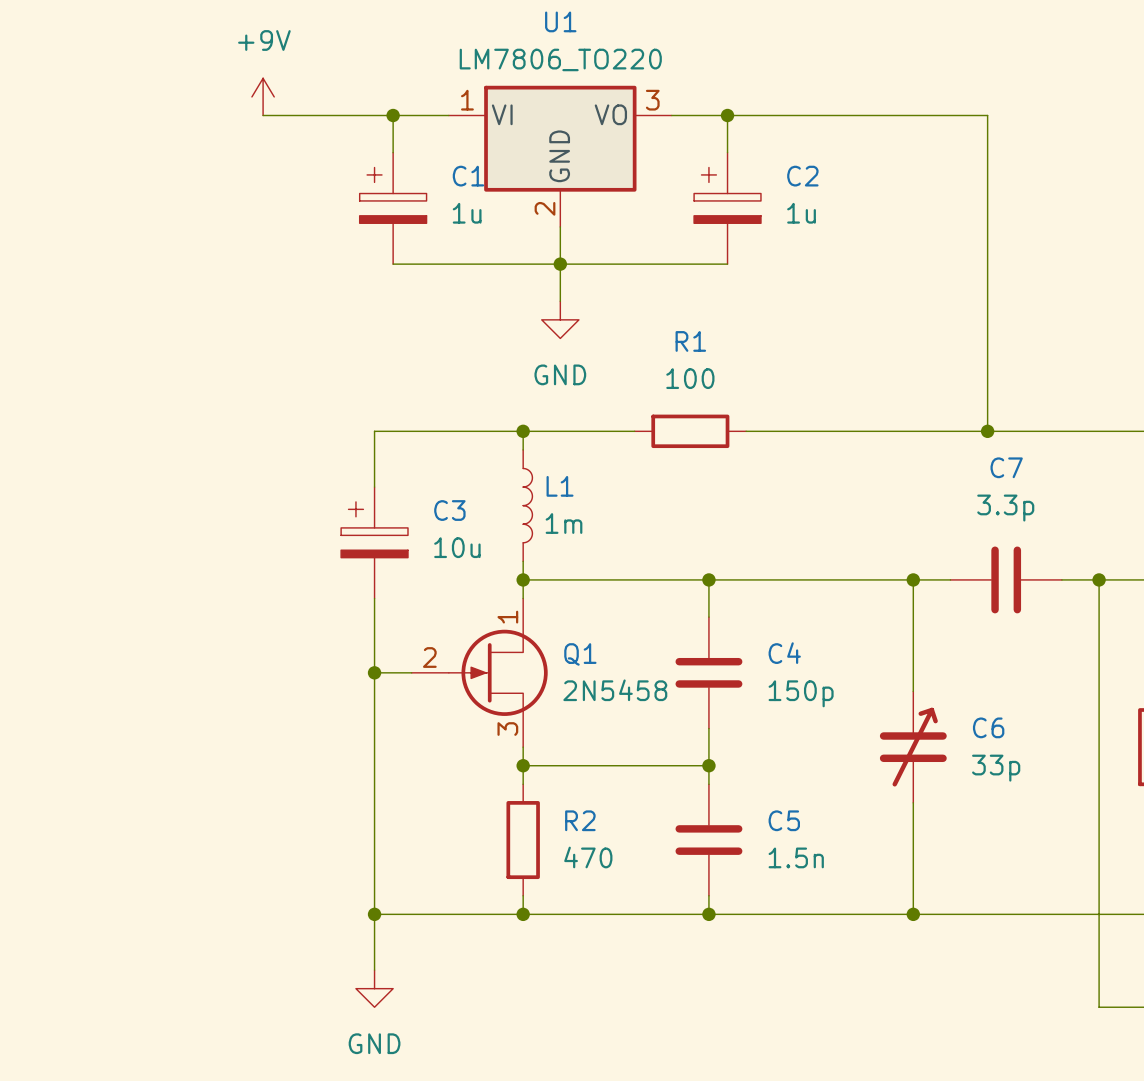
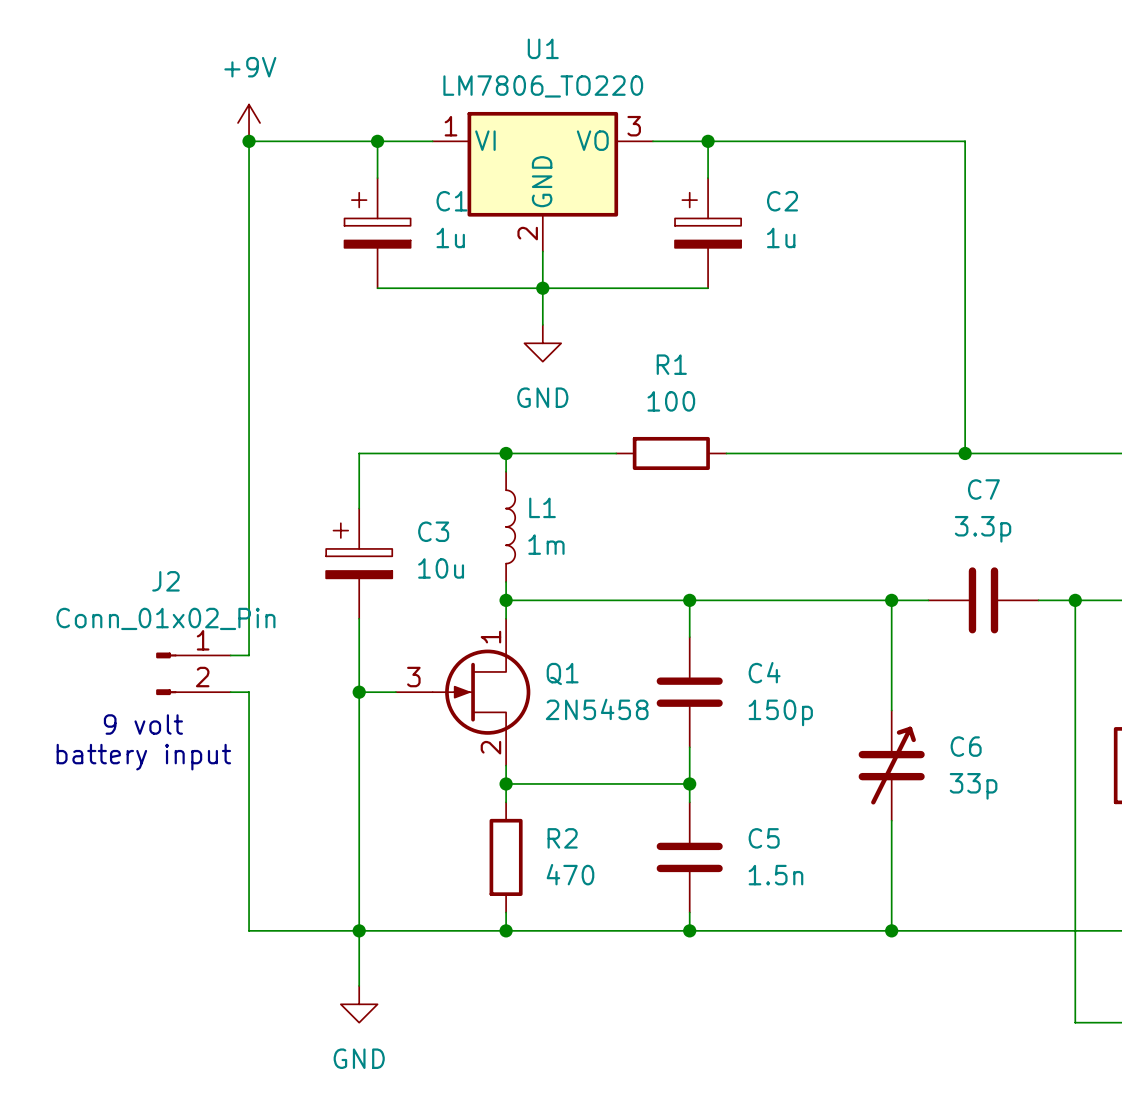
wire: none -> (249, 141) (249, 655) (230, 655)
junction: none -> (249, 141)
J2: none -> Conn_01x02_Pin (193, 673)
Q1 pin number: 2 (429, 657) -> 3 (413, 677)
wire: none -> (230, 692) (249, 692) (249, 930) (359, 930)
text: none -> 9 volt (143, 724)
Q1 pin number: 3 (507, 729) -> 2 (490, 747)
text: none -> battery input (143, 757)

